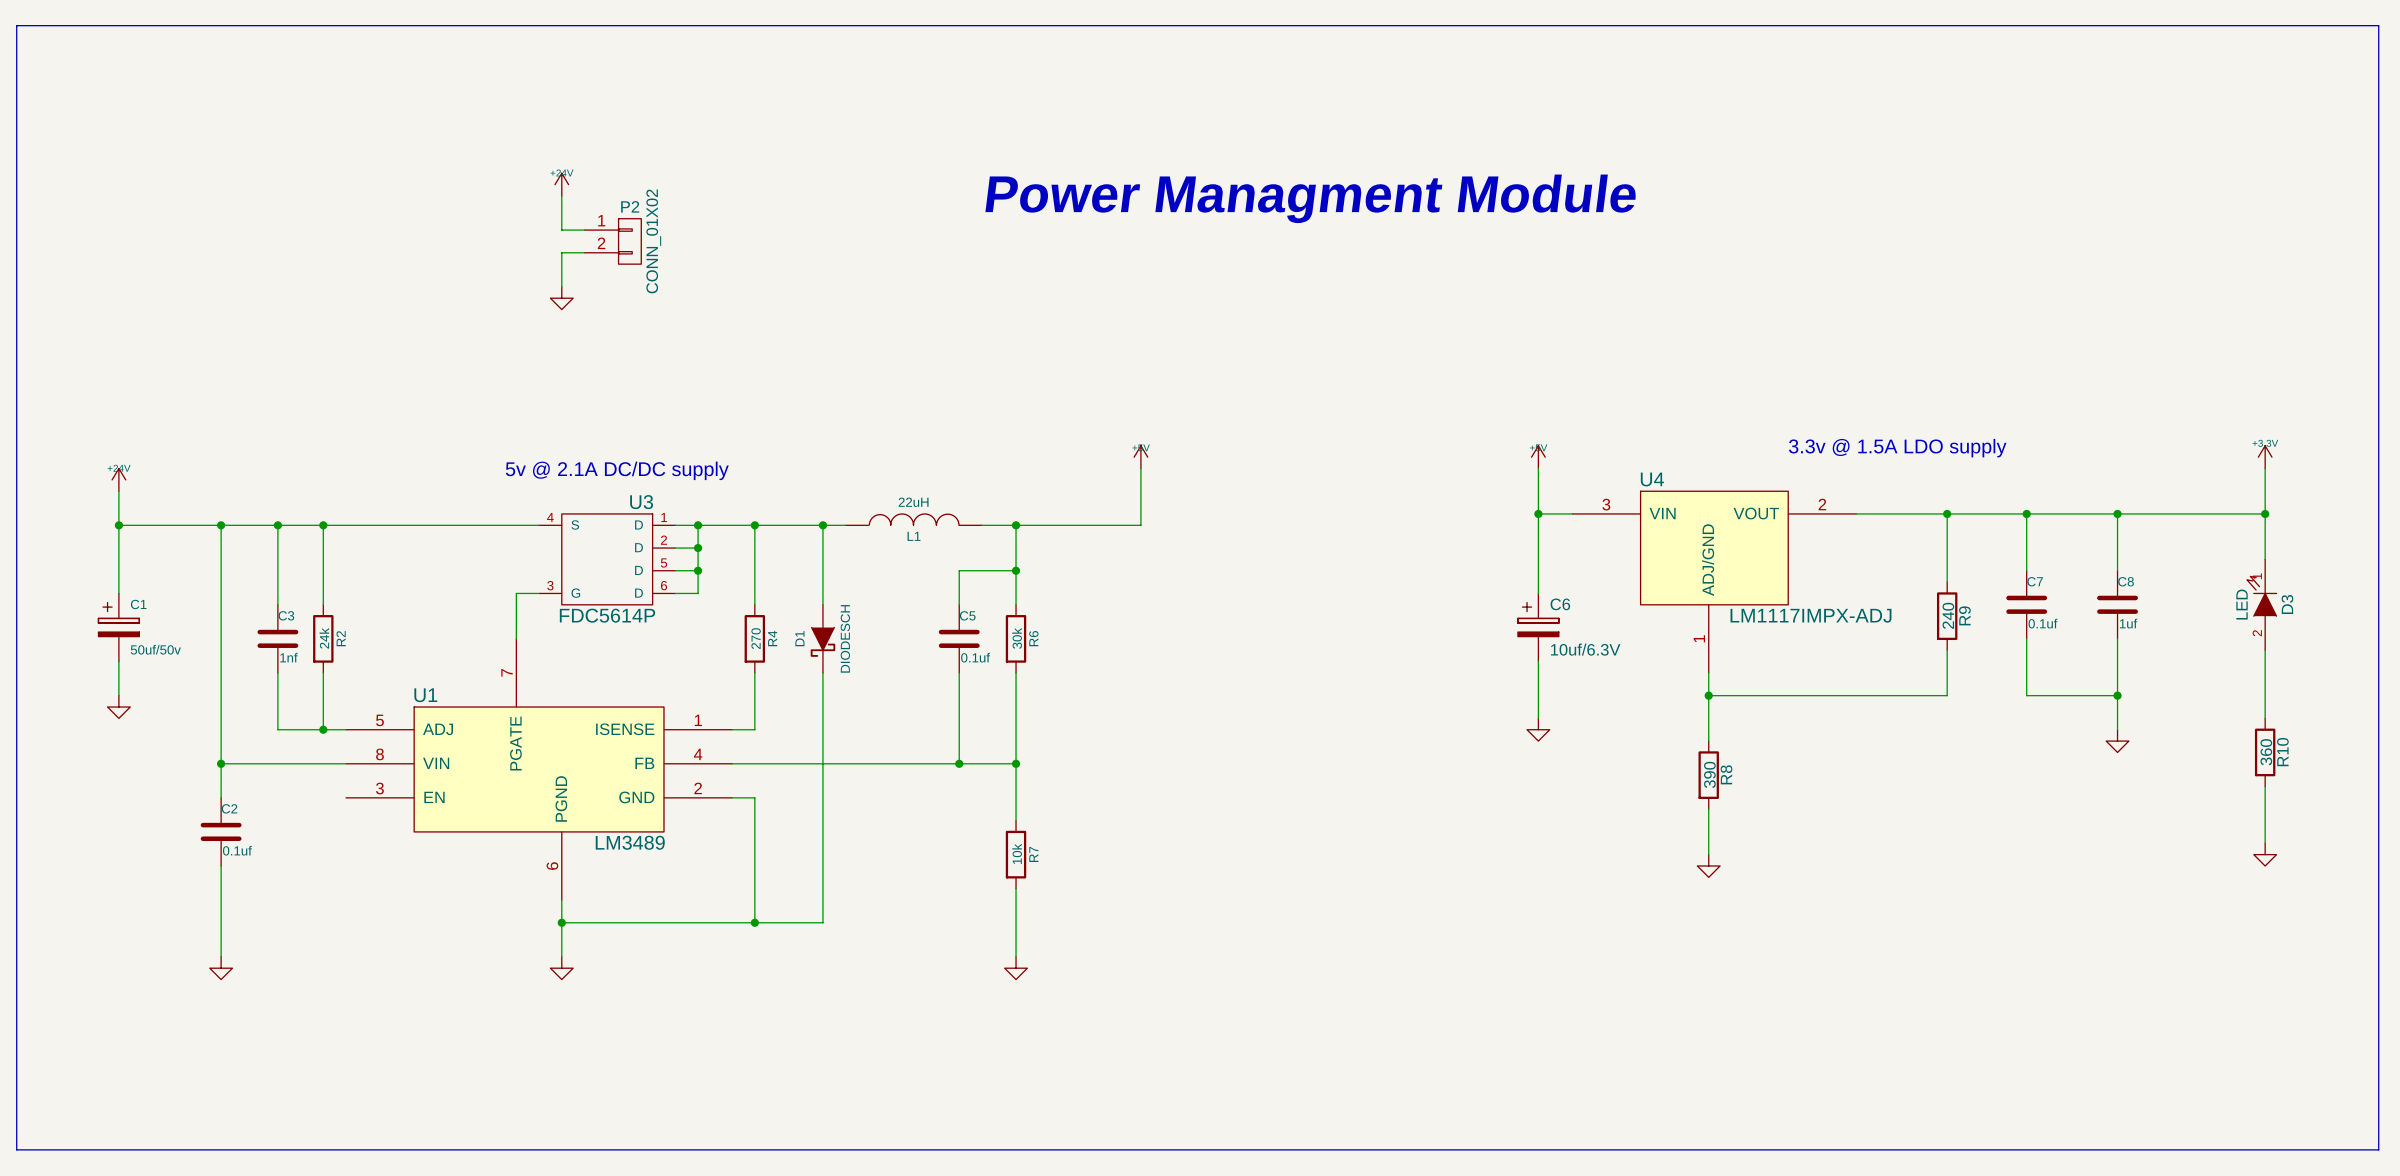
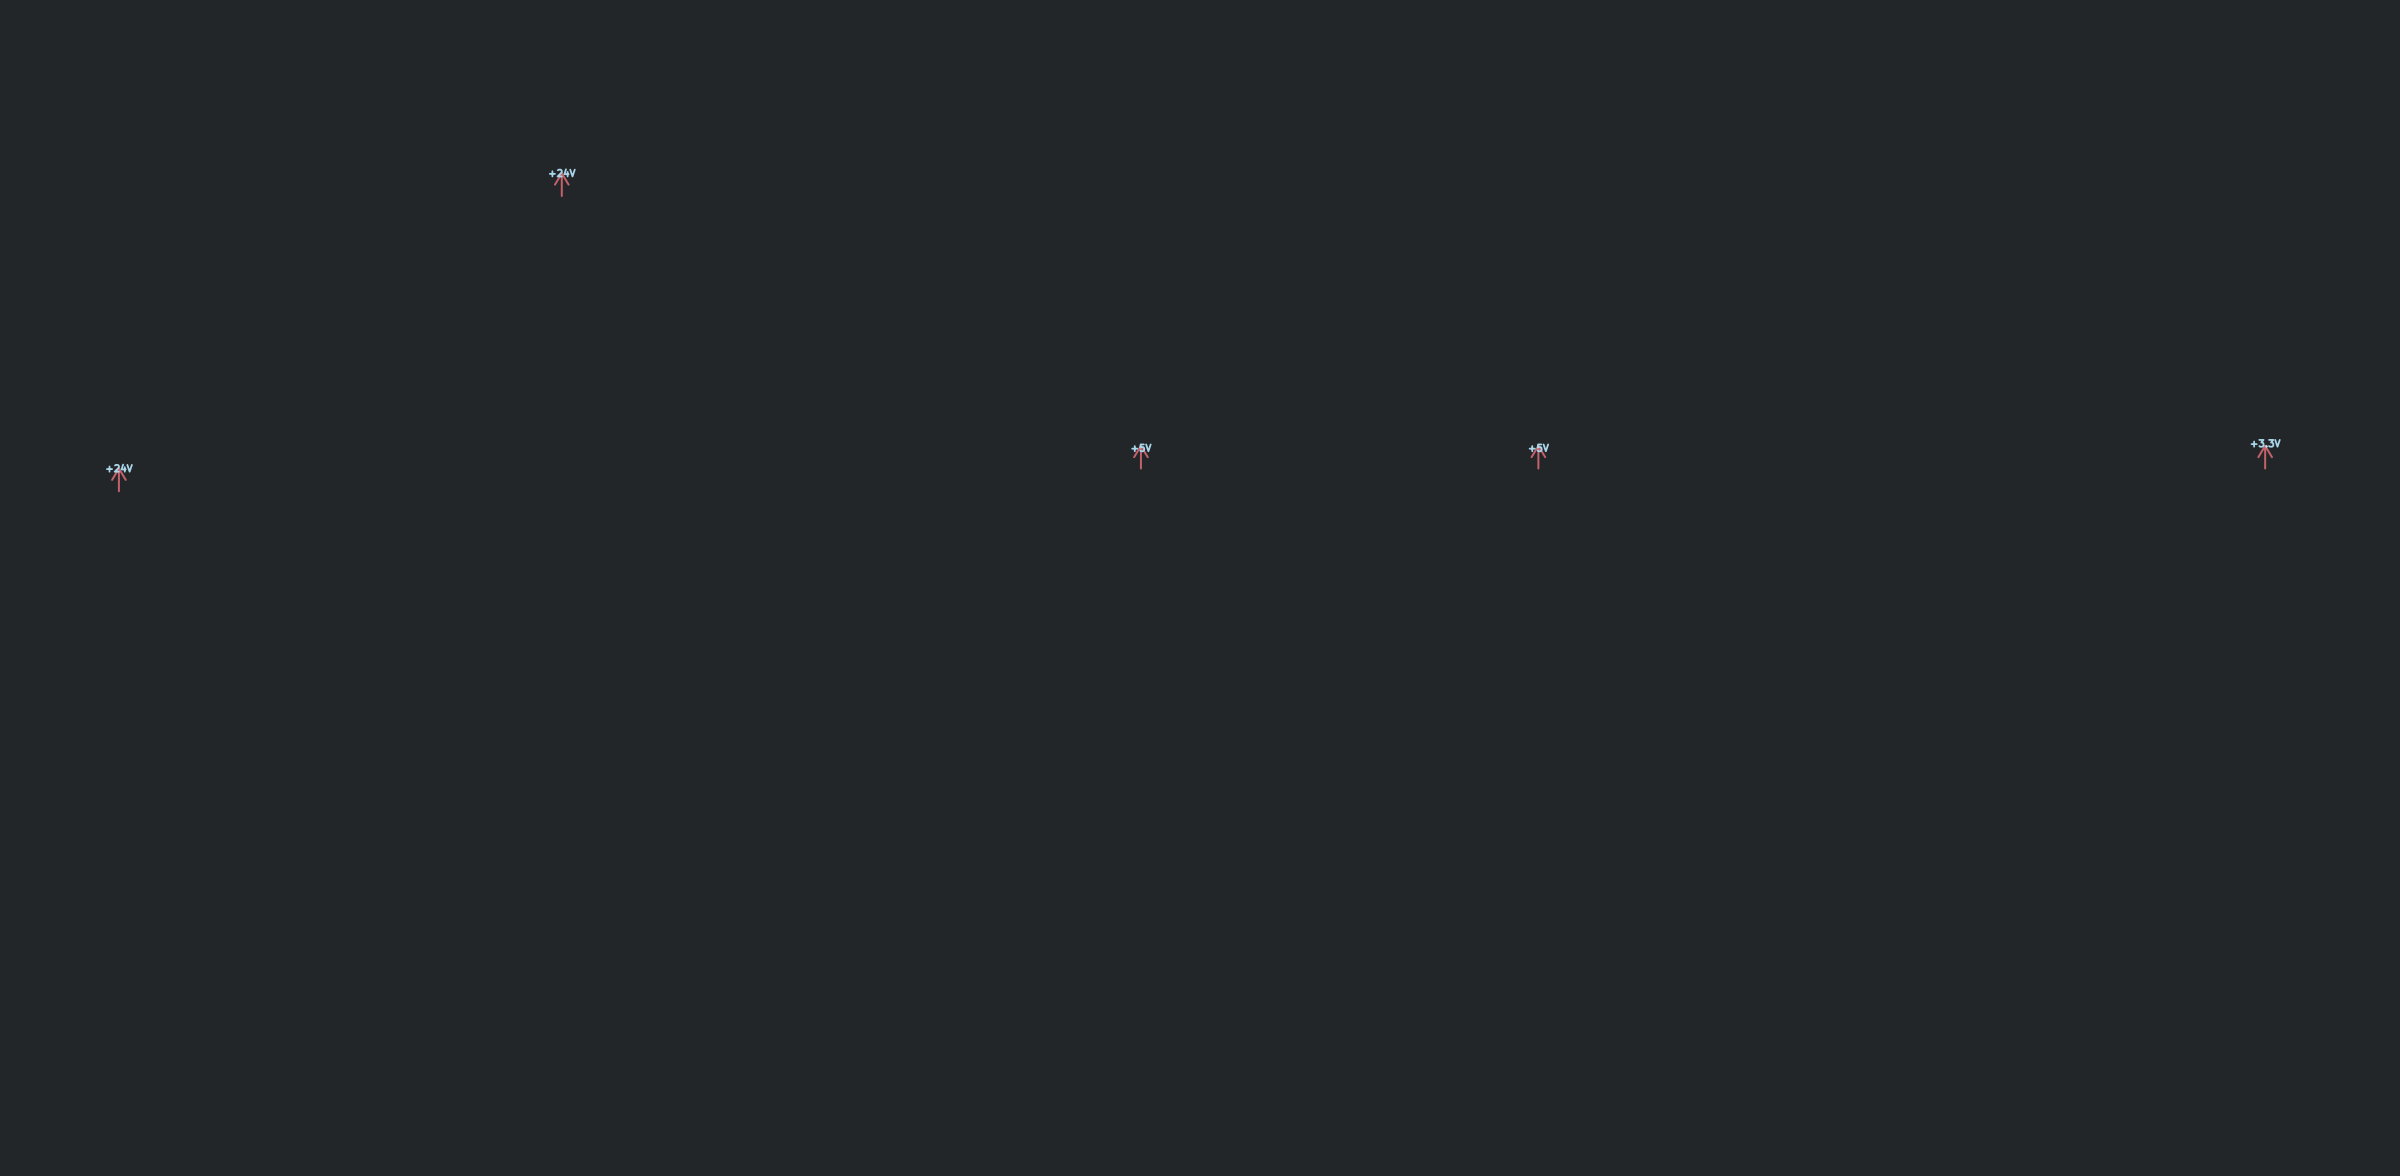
line: (16, 25) (16, 1149) (2378, 1149) (2378, 25) (16, 25) -> none
wire: (561, 196) (561, 230) (584, 230) -> none
text: Power Managment Module (1310, 198) -> none
P2: CONN_01X02 (612, 241) -> none
wire: (584, 252) (561, 252) (561, 286) -> none
power symbol: (561, 298) -> none
text: 3.3v @ 1.5A LDO supply (1897, 448) -> none
wire: (1140, 468) (1140, 525) (981, 525) -> none
wire: (1538, 468) (1538, 593) -> none
wire: (2265, 468) (2265, 559) -> none
text: 5v @ 2.1A DC/DC supply (617, 470) -> none
wire: (118, 491) (118, 593) -> none
wire: (1538, 513) (1572, 513) -> none
junction: (1538, 513) -> none
wire: (1856, 513) (2265, 513) -> none
wire: (1947, 513) (1947, 582) -> none
junction: (1947, 513) -> none
wire: (2026, 513) (2026, 570) -> none
junction: (2026, 513) -> none
wire: (2117, 513) (2117, 570) -> none
junction: (2117, 513) -> none
junction: (2265, 513) -> none
L1: 22uH (913, 519) -> none
wire: (118, 525) (539, 525) -> none
junction: (118, 525) -> none
wire: (221, 525) (221, 797) -> none
junction: (221, 525) -> none
wire: (277, 525) (277, 604) -> none
junction: (277, 525) -> none
wire: (323, 525) (323, 604) -> none
junction: (323, 525) -> none
wire: (675, 525) (845, 525) -> none
wire: (698, 525) (698, 593) (675, 593) -> none
junction: (698, 525) -> none
wire: (754, 525) (754, 604) -> none
junction: (754, 525) -> none
wire: (822, 525) (822, 604) -> none
junction: (822, 525) -> none
wire: (1016, 525) (1016, 604) -> none
junction: (1016, 525) -> none
wire: (675, 548) (698, 548) -> none
junction: (698, 548) -> none
U3: FDC5614P (607, 559) -> none
wire: (675, 570) (698, 570) -> none
junction: (698, 570) -> none
wire: (1016, 570) (959, 570) (959, 604) -> none
junction: (1016, 570) -> none
U4: LM1117IMPX-ADJ (1714, 582) -> none
wire: (539, 593) (516, 593) (516, 638) -> none
C7: 0.1uf (2026, 604) -> none
C8: 1uf (2117, 604) -> none
D3: LED (2261, 604) -> none
R9: 240 (1947, 616) -> none
C1: 50uf/50v (118, 627) -> none
C6: 10uf/6.3V (1538, 627) -> none
C3: 1nf (277, 638) -> none
R2: 24k (323, 638) -> none
R4: 270 (754, 638) -> none
D1: DIODESCH (822, 638) -> none
C5: 0.1uf (959, 638) -> none
R6: 30k (1016, 638) -> none
wire: (2026, 638) (2026, 695) (2117, 695) -> none
wire: (2117, 638) (2117, 729) -> none
wire: (1947, 650) (1947, 695) (1708, 695) -> none
wire: (2265, 650) (2265, 718) -> none
wire: (118, 661) (118, 695) -> none
wire: (1538, 661) (1538, 718) -> none
wire: (277, 672) (277, 729) (346, 729) -> none
wire: (323, 672) (323, 729) -> none
wire: (754, 672) (754, 729) (732, 729) -> none
wire: (822, 672) (822, 922) (561, 922) -> none
wire: (959, 672) (959, 763) -> none
wire: (1016, 672) (1016, 820) -> none
wire: (1708, 672) (1708, 741) -> none
junction: (1708, 695) -> none
junction: (2117, 695) -> none
power symbol: (118, 707) -> none
junction: (323, 729) -> none
power symbol: (1538, 729) -> none
power symbol: (2117, 741) -> none
R10: 360 (2265, 752) -> none
wire: (221, 763) (346, 763) -> none
junction: (221, 763) -> none
wire: (732, 763) (1016, 763) -> none
junction: (959, 763) -> none
junction: (1016, 763) -> none
U1: LM3489 (539, 769) -> none
R8: 390 (1708, 775) -> none
wire: (2265, 786) (2265, 843) -> none
wire: (732, 797) (754, 797) (754, 922) -> none
wire: (1708, 809) (1708, 854) -> none
C2: 0.1uf (221, 831) -> none
R7: 10k (1016, 854) -> none
power symbol: (2265, 854) -> none
wire: (221, 866) (221, 956) -> none
power symbol: (1708, 866) -> none
wire: (1016, 888) (1016, 956) -> none
wire: (561, 900) (561, 956) -> none
junction: (561, 922) -> none
junction: (754, 922) -> none
power symbol: (221, 968) -> none
power symbol: (561, 968) -> none
power symbol: (1016, 968) -> none

